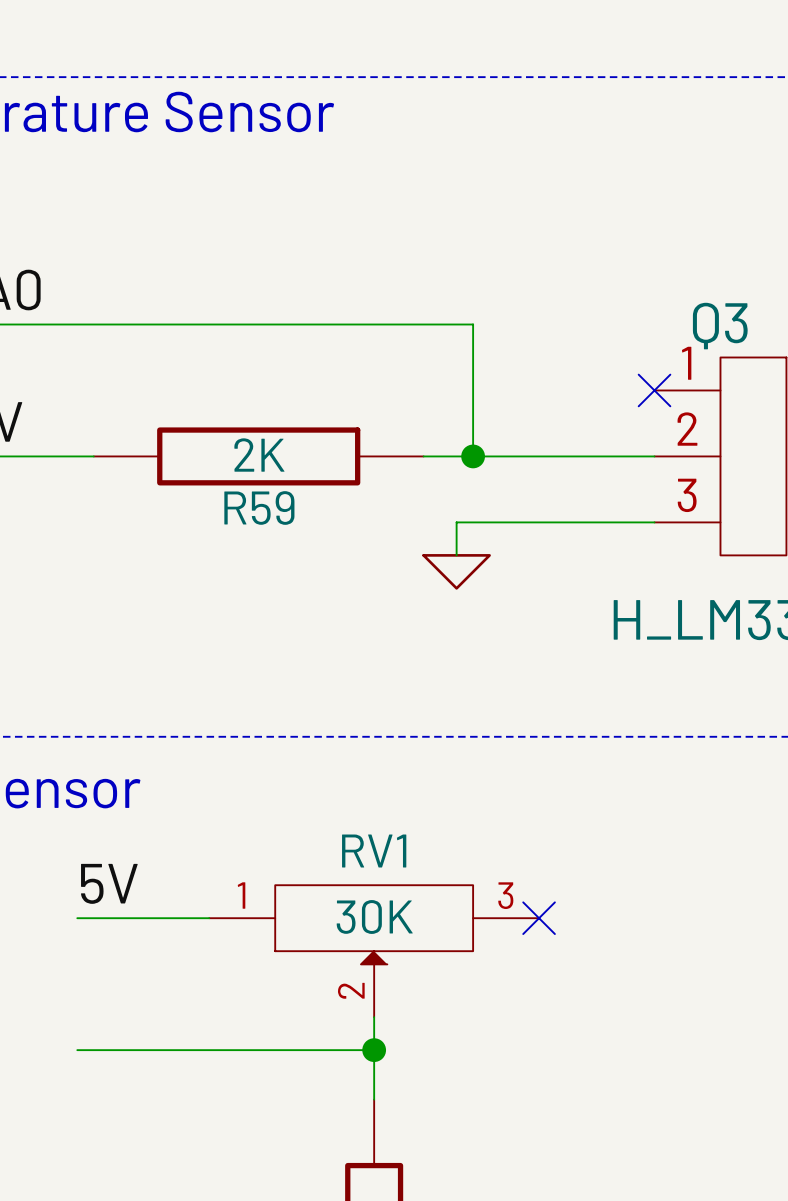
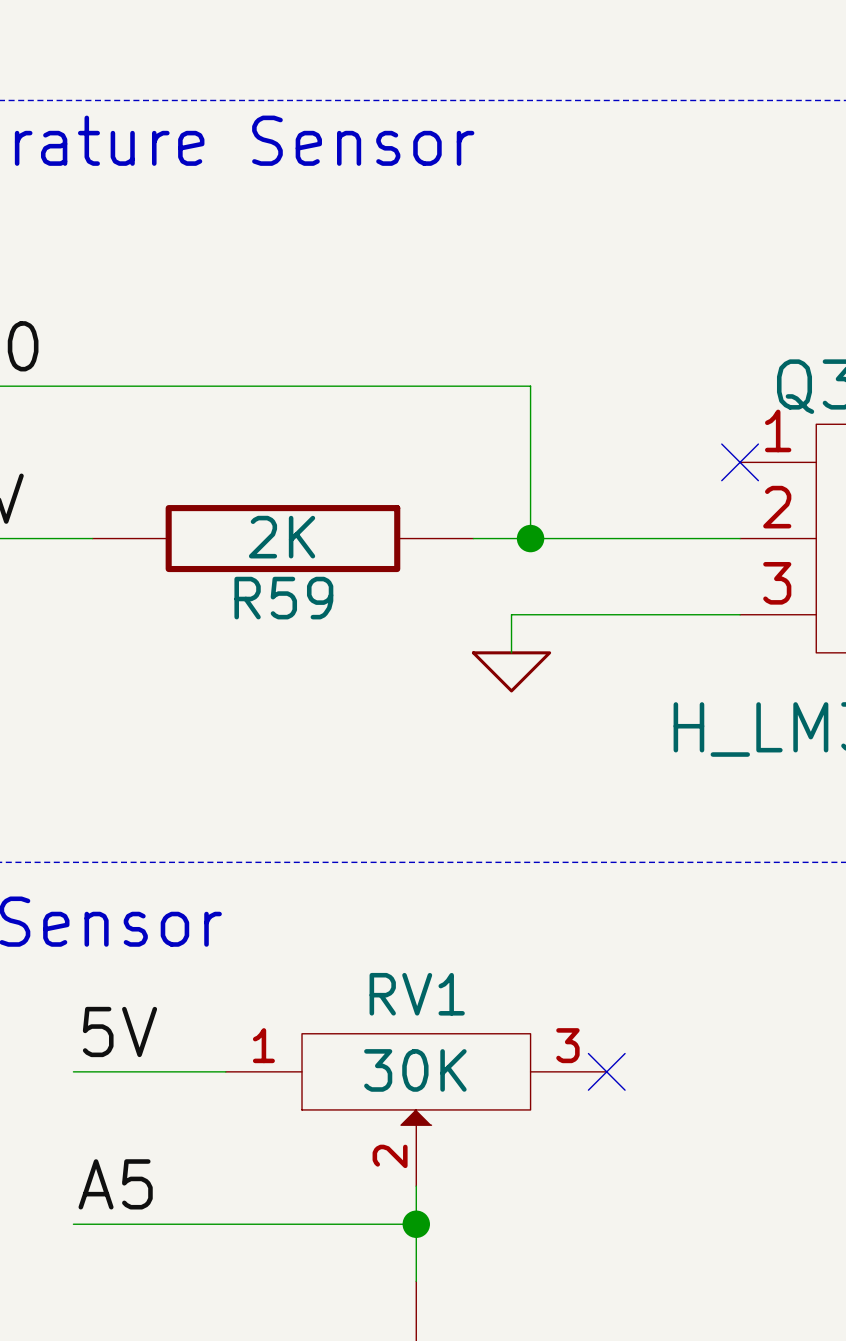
label: none -> A5 (115, 1184)

